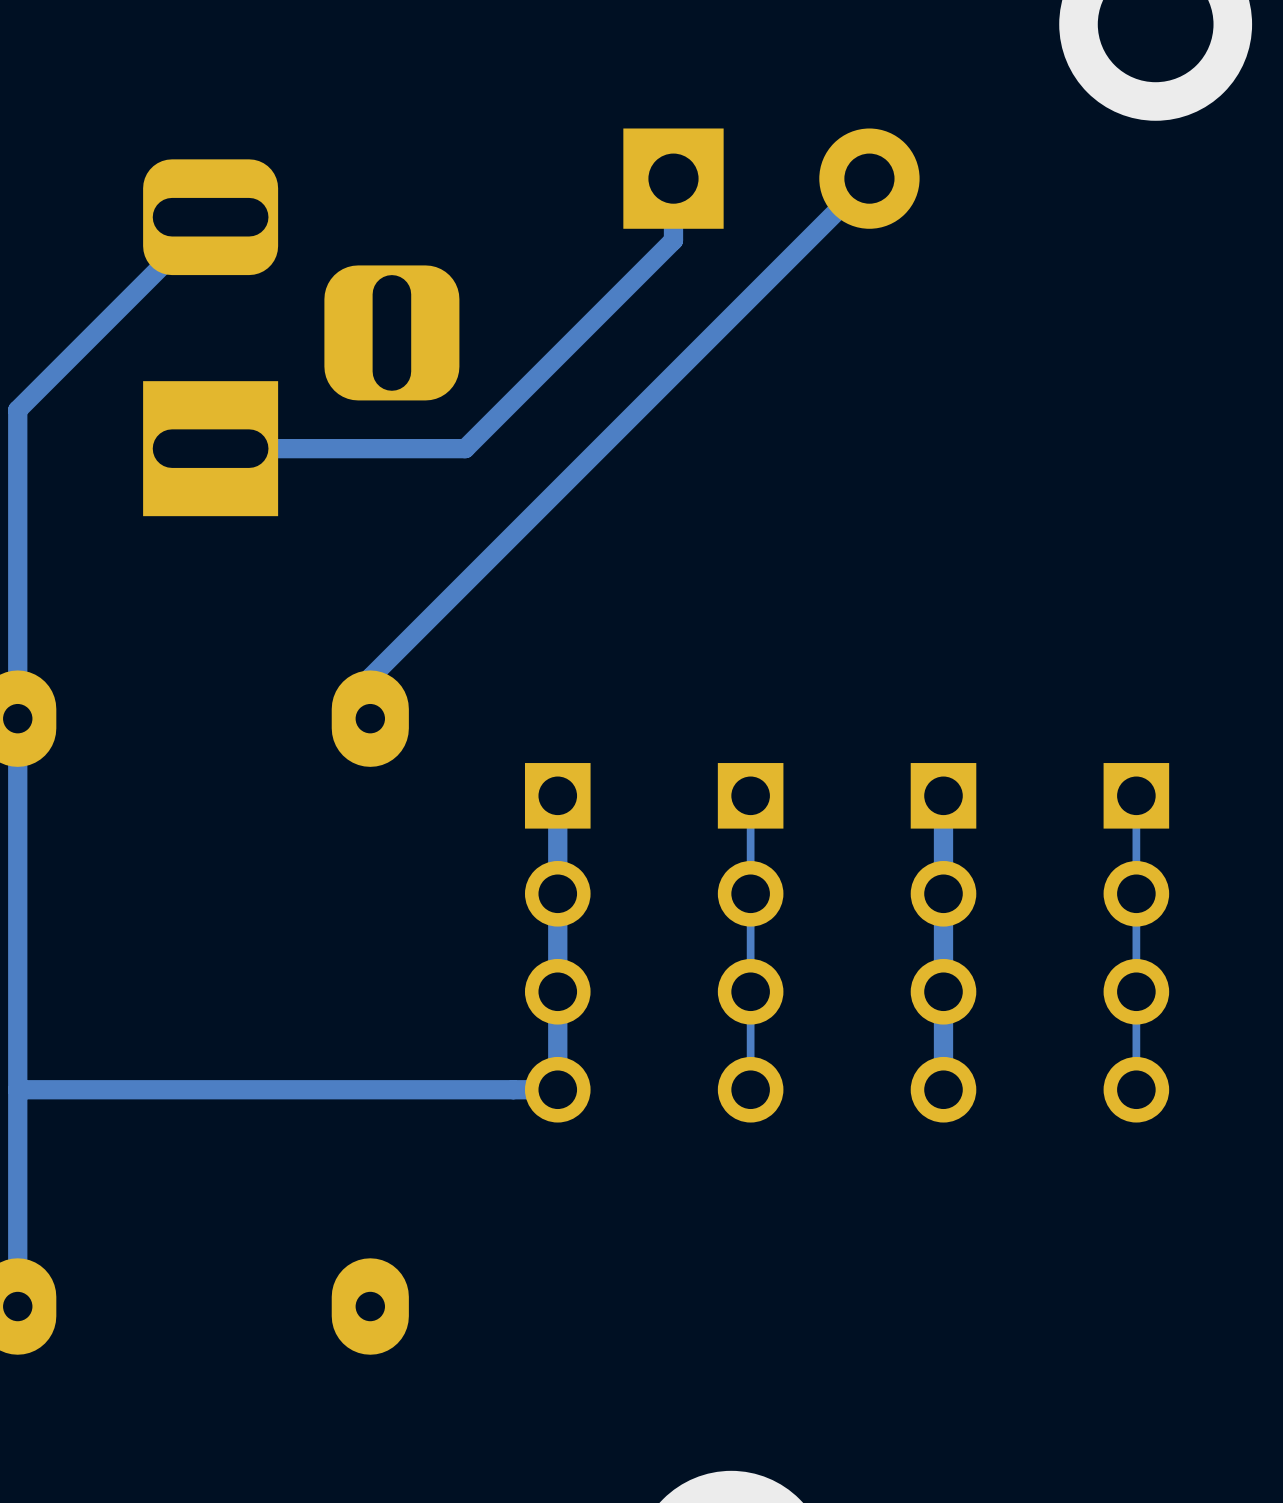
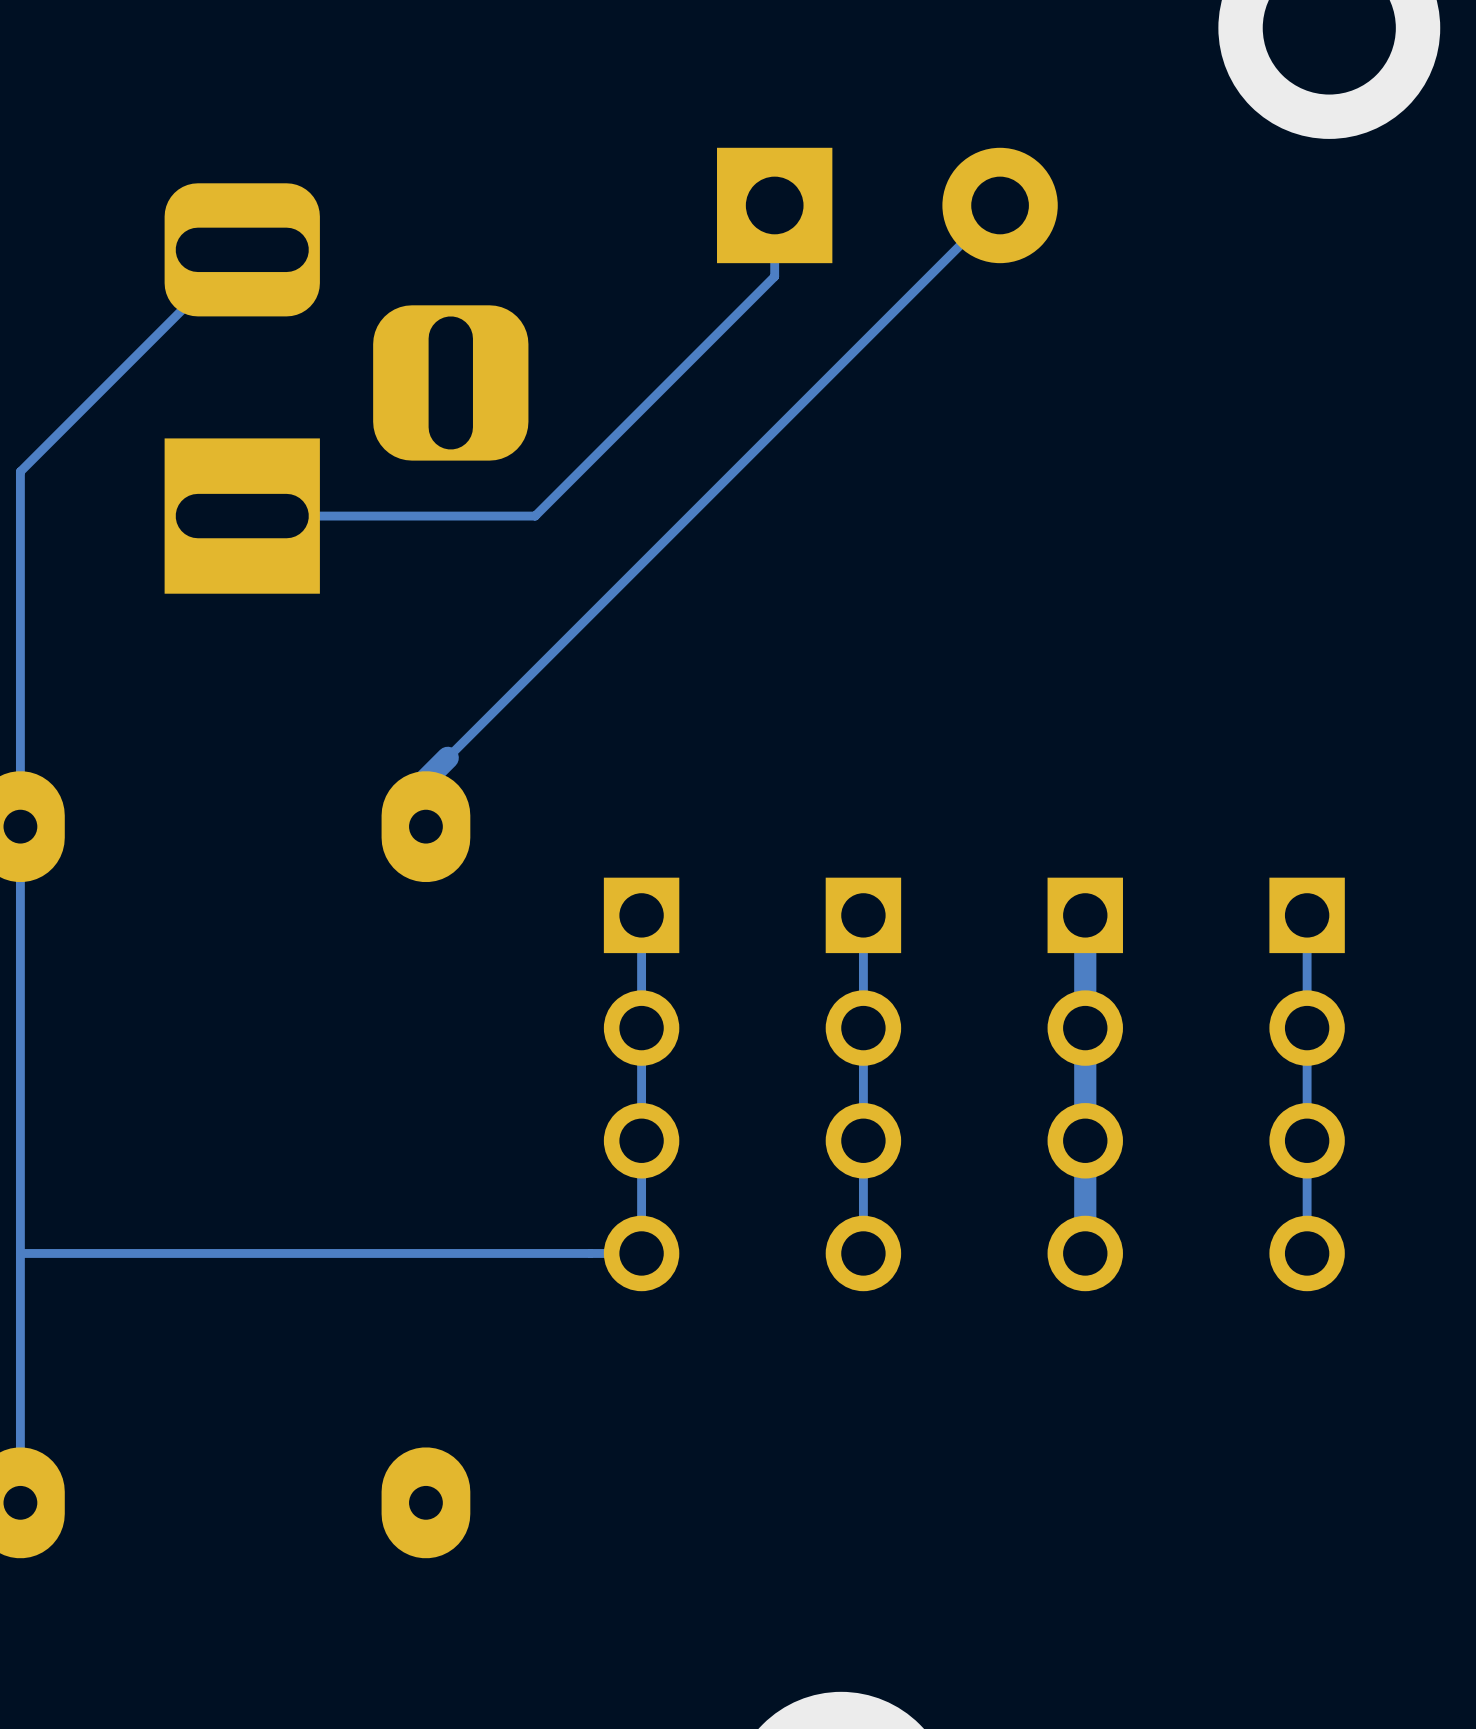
track width: thick (673, 178) (673, 240) (465, 448) (210, 448) -> thin (774, 205) (774, 276) (535, 516) (242, 516)
track width: thick (869, 178) (389, 658) -> thin (1000, 205) (447, 757)
track width: thick (210, 217) (17, 410) (17, 1306) -> thin (242, 249) (20, 471) (20, 1502)
track width: thick (557, 795) (557, 1089) (17, 1089) -> thin (641, 915) (641, 1253) (20, 1253)

